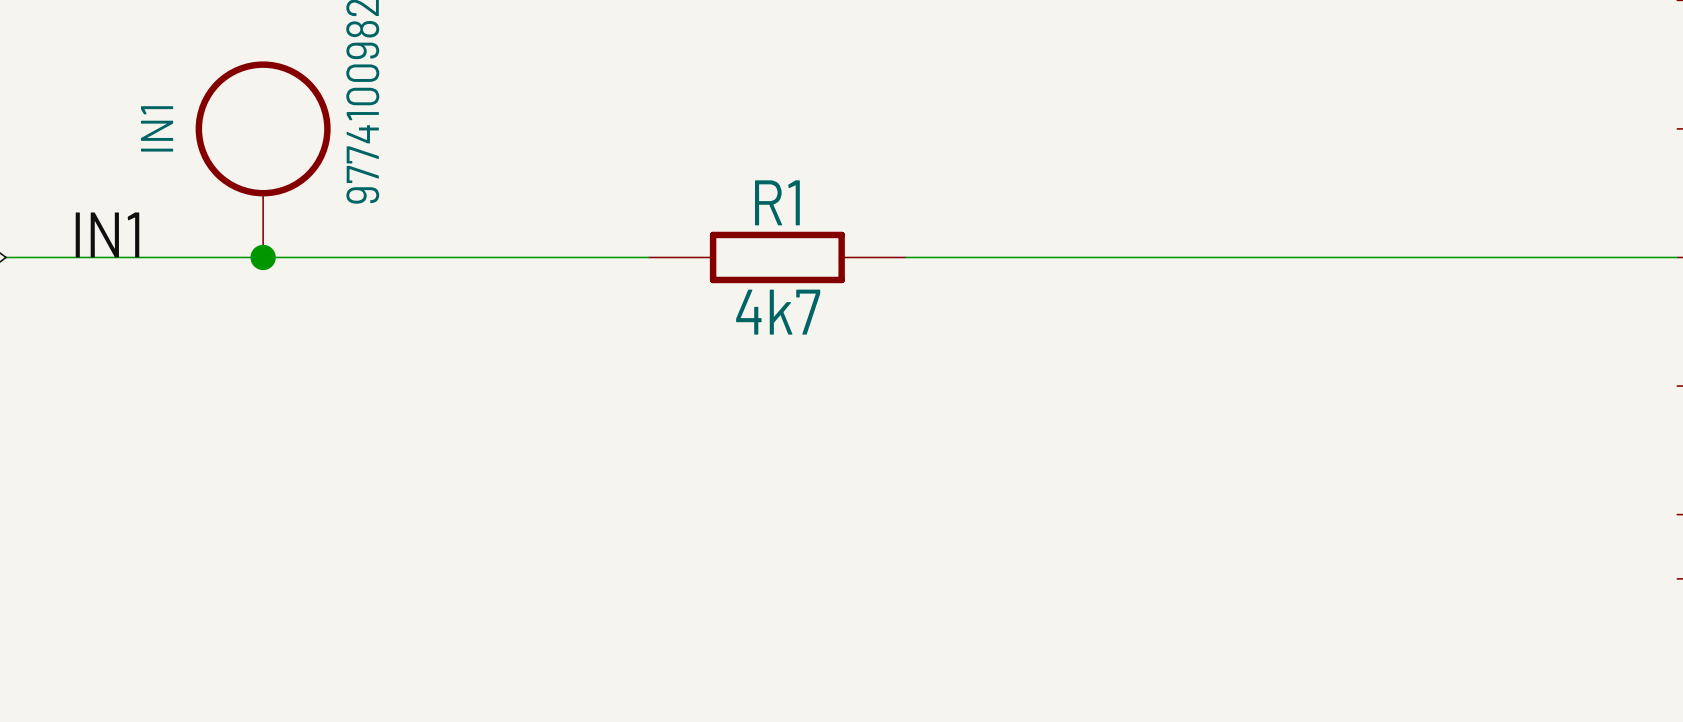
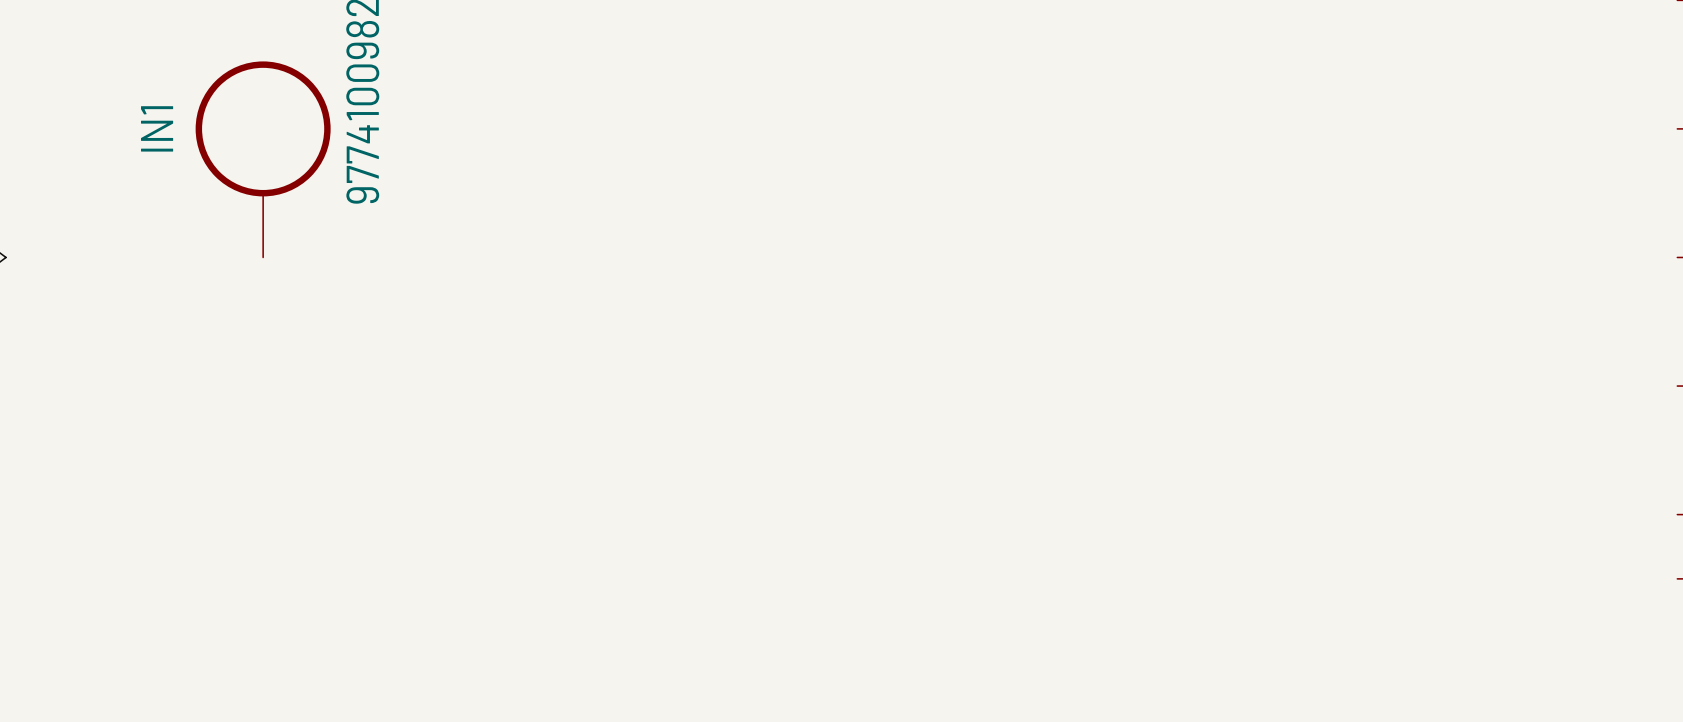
label: IN1 (107, 234) -> none
wire: (6, 257) (648, 257) -> none
junction: (263, 257) -> none
R1: 4k7 (777, 257) -> none
wire: (905, 257) (1677, 257) -> none

